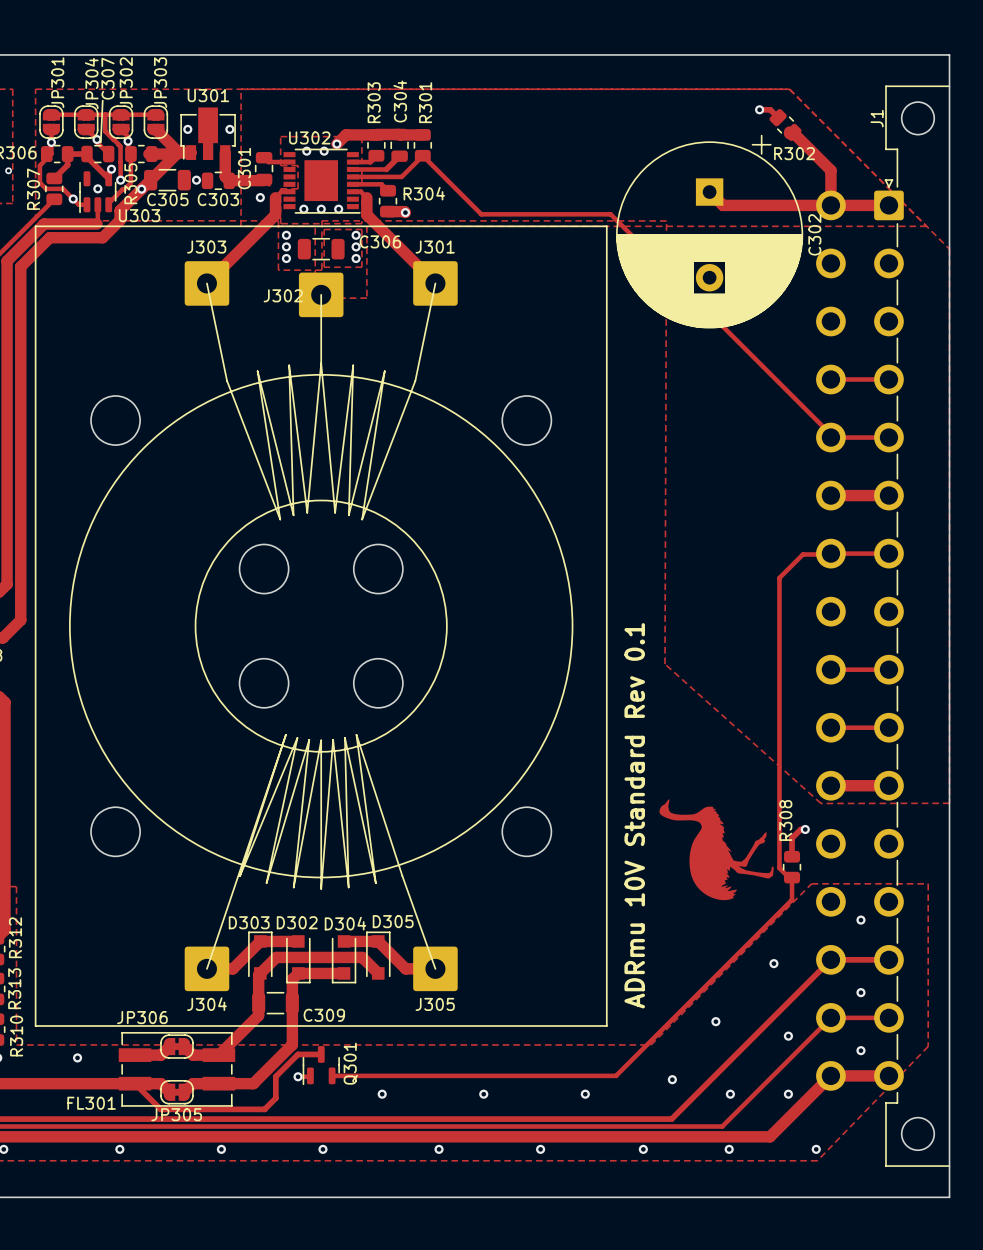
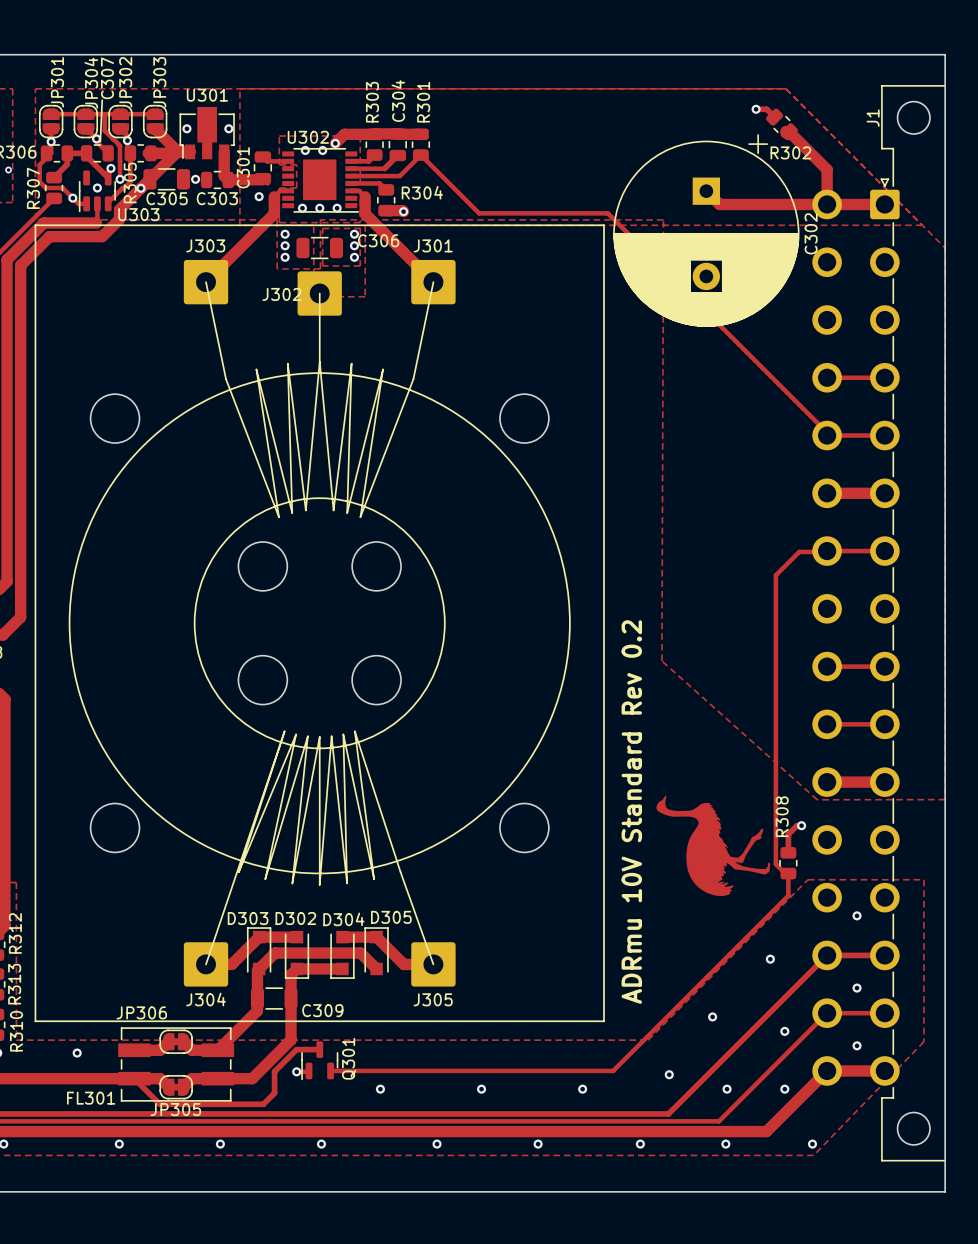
text: ADRmu 10V Standard Rev 0.1 (634, 815) -> ADRmu 10V Standard Rev 0.2 (631, 812)

